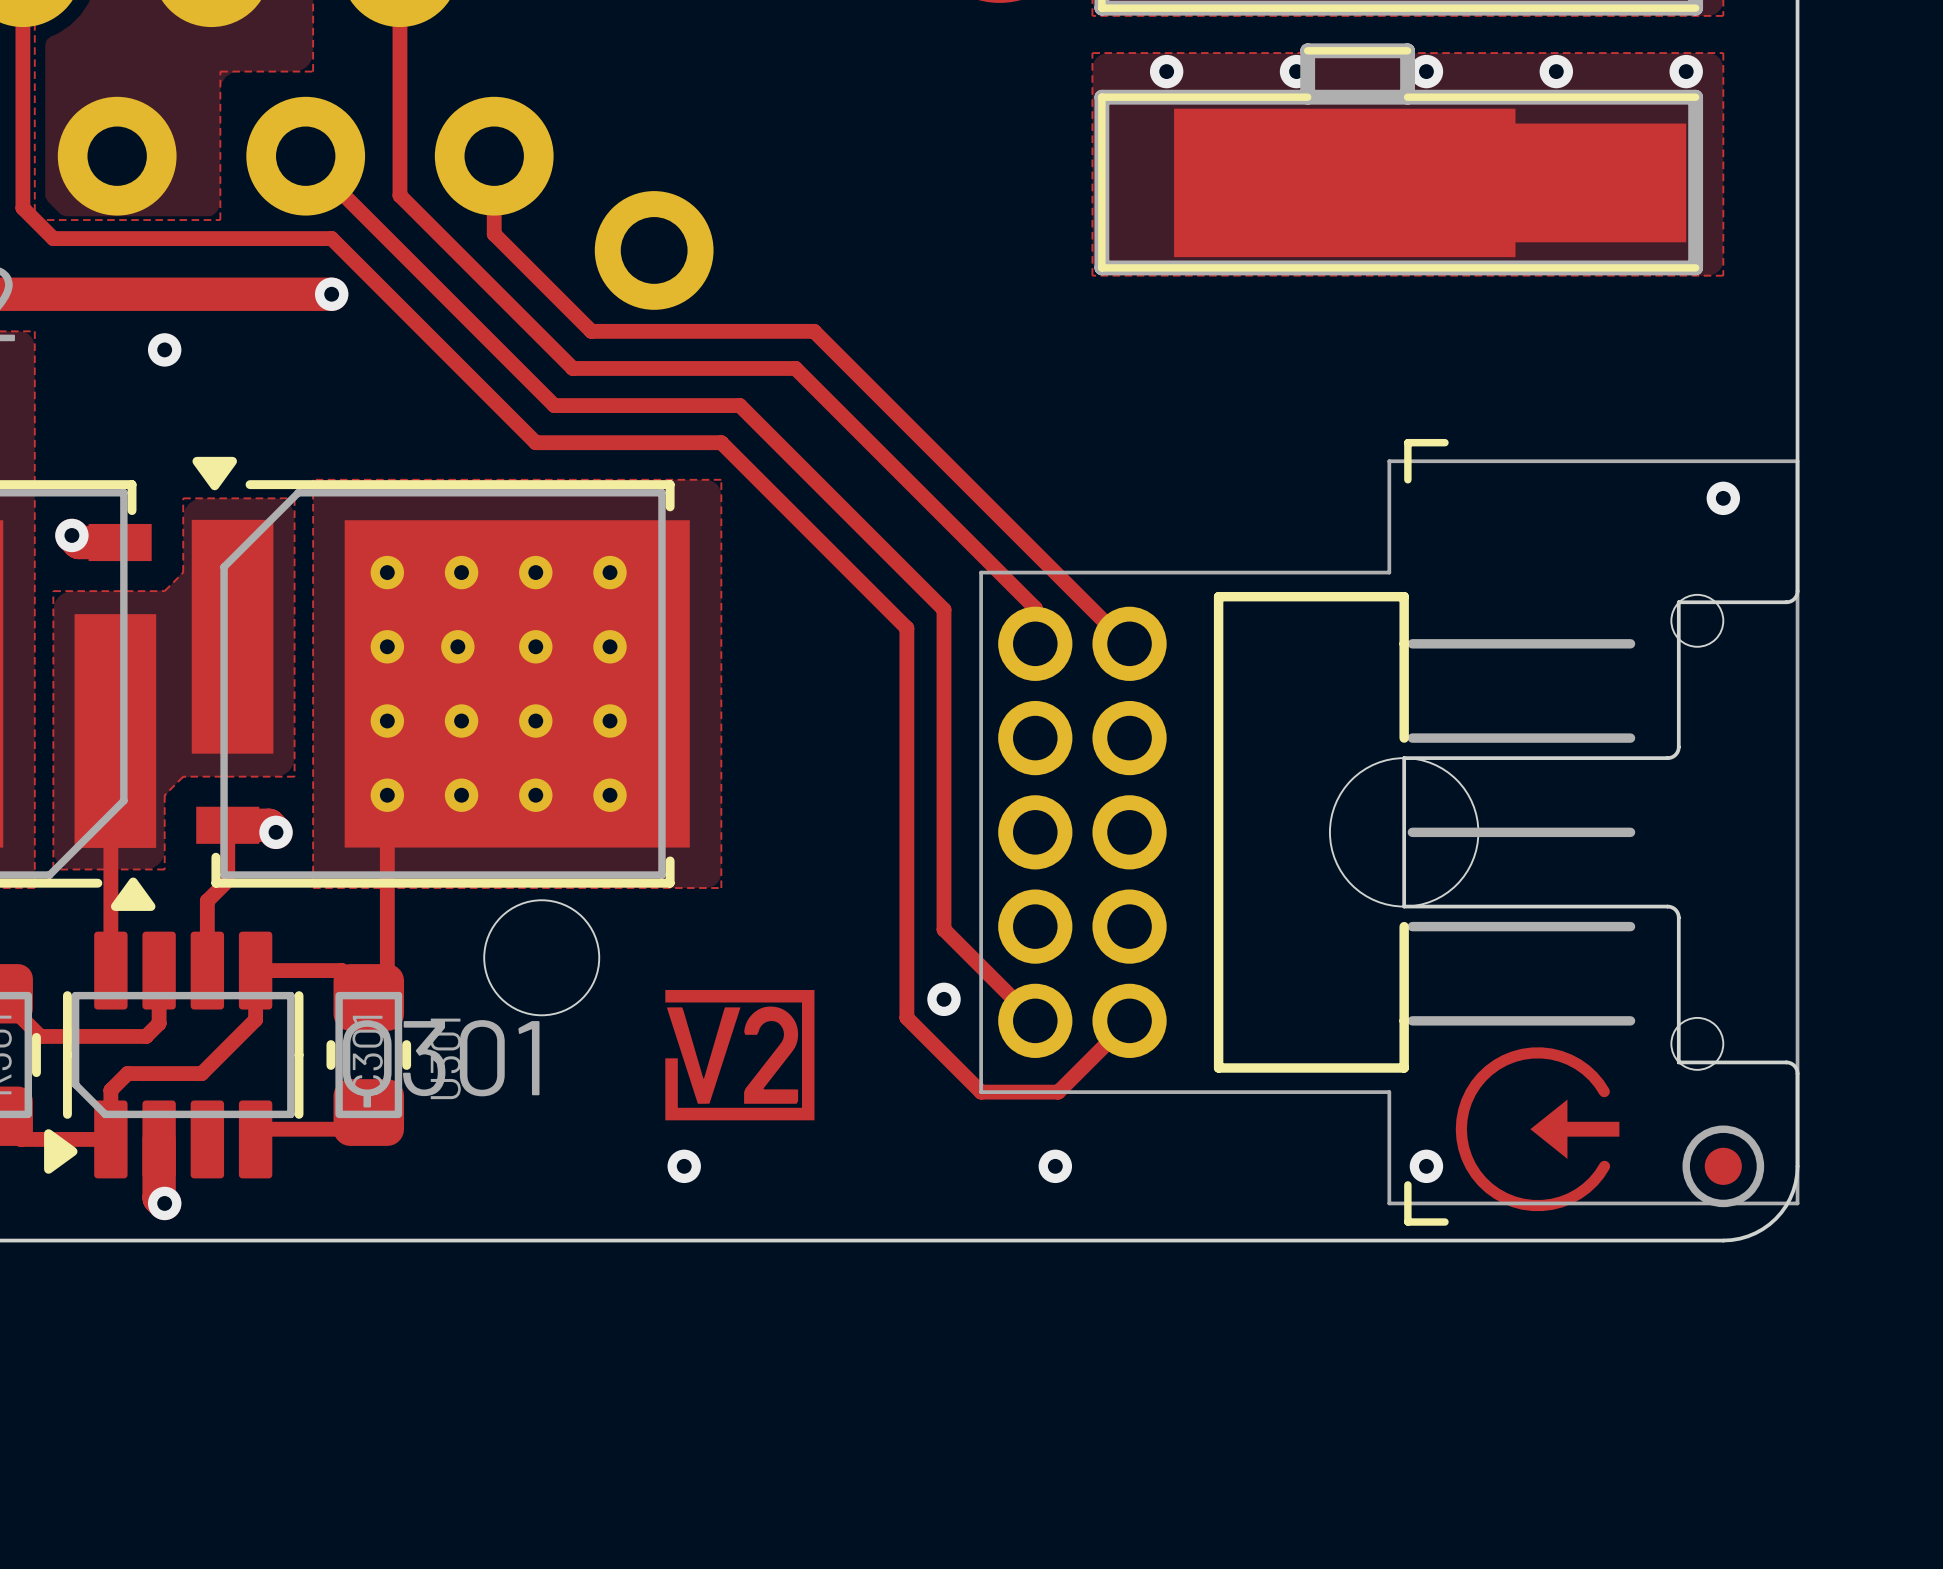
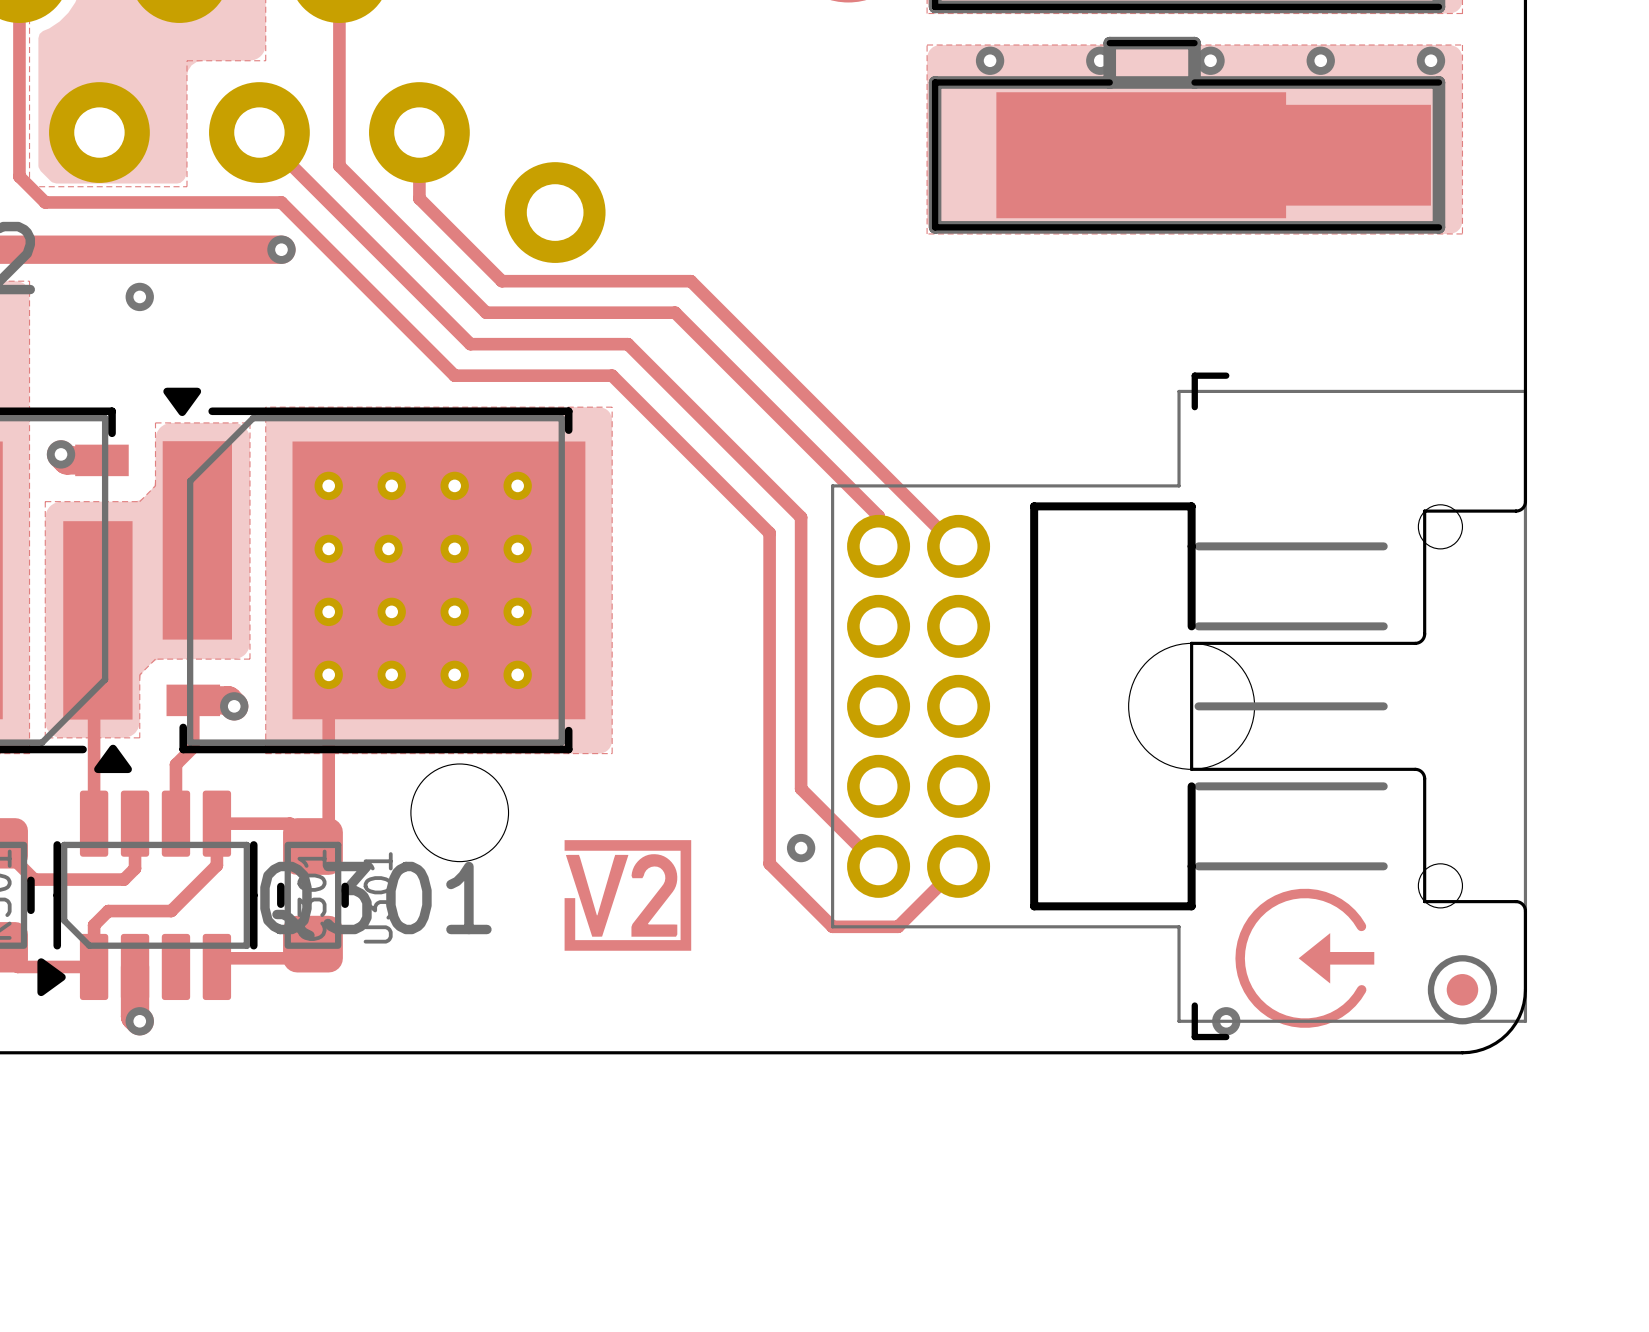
via: (1723, 498) -> none
via: (684, 1166) -> none
via: (1055, 1166) -> none
via position: (1426, 1166) -> (1226, 1021)

